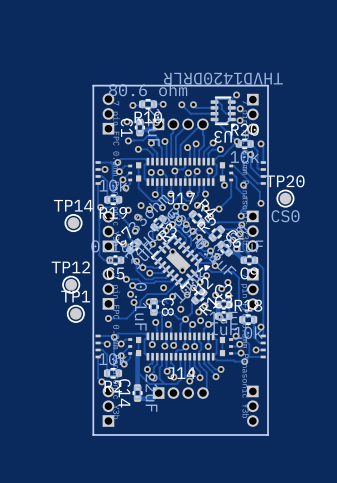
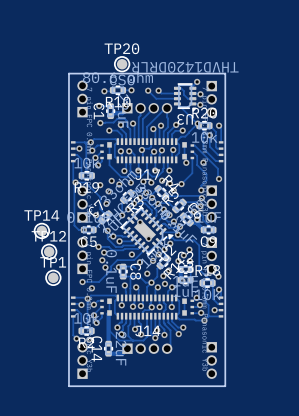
TP20 position: (285, 198) -> (122, 64)
TP14 position: (73, 223) -> (41, 230)
track: (254, 260) (263, 268) (263, 324) -> none
via: none -> (218, 276)
via: none -> (91, 288)
via: none -> (89, 339)

